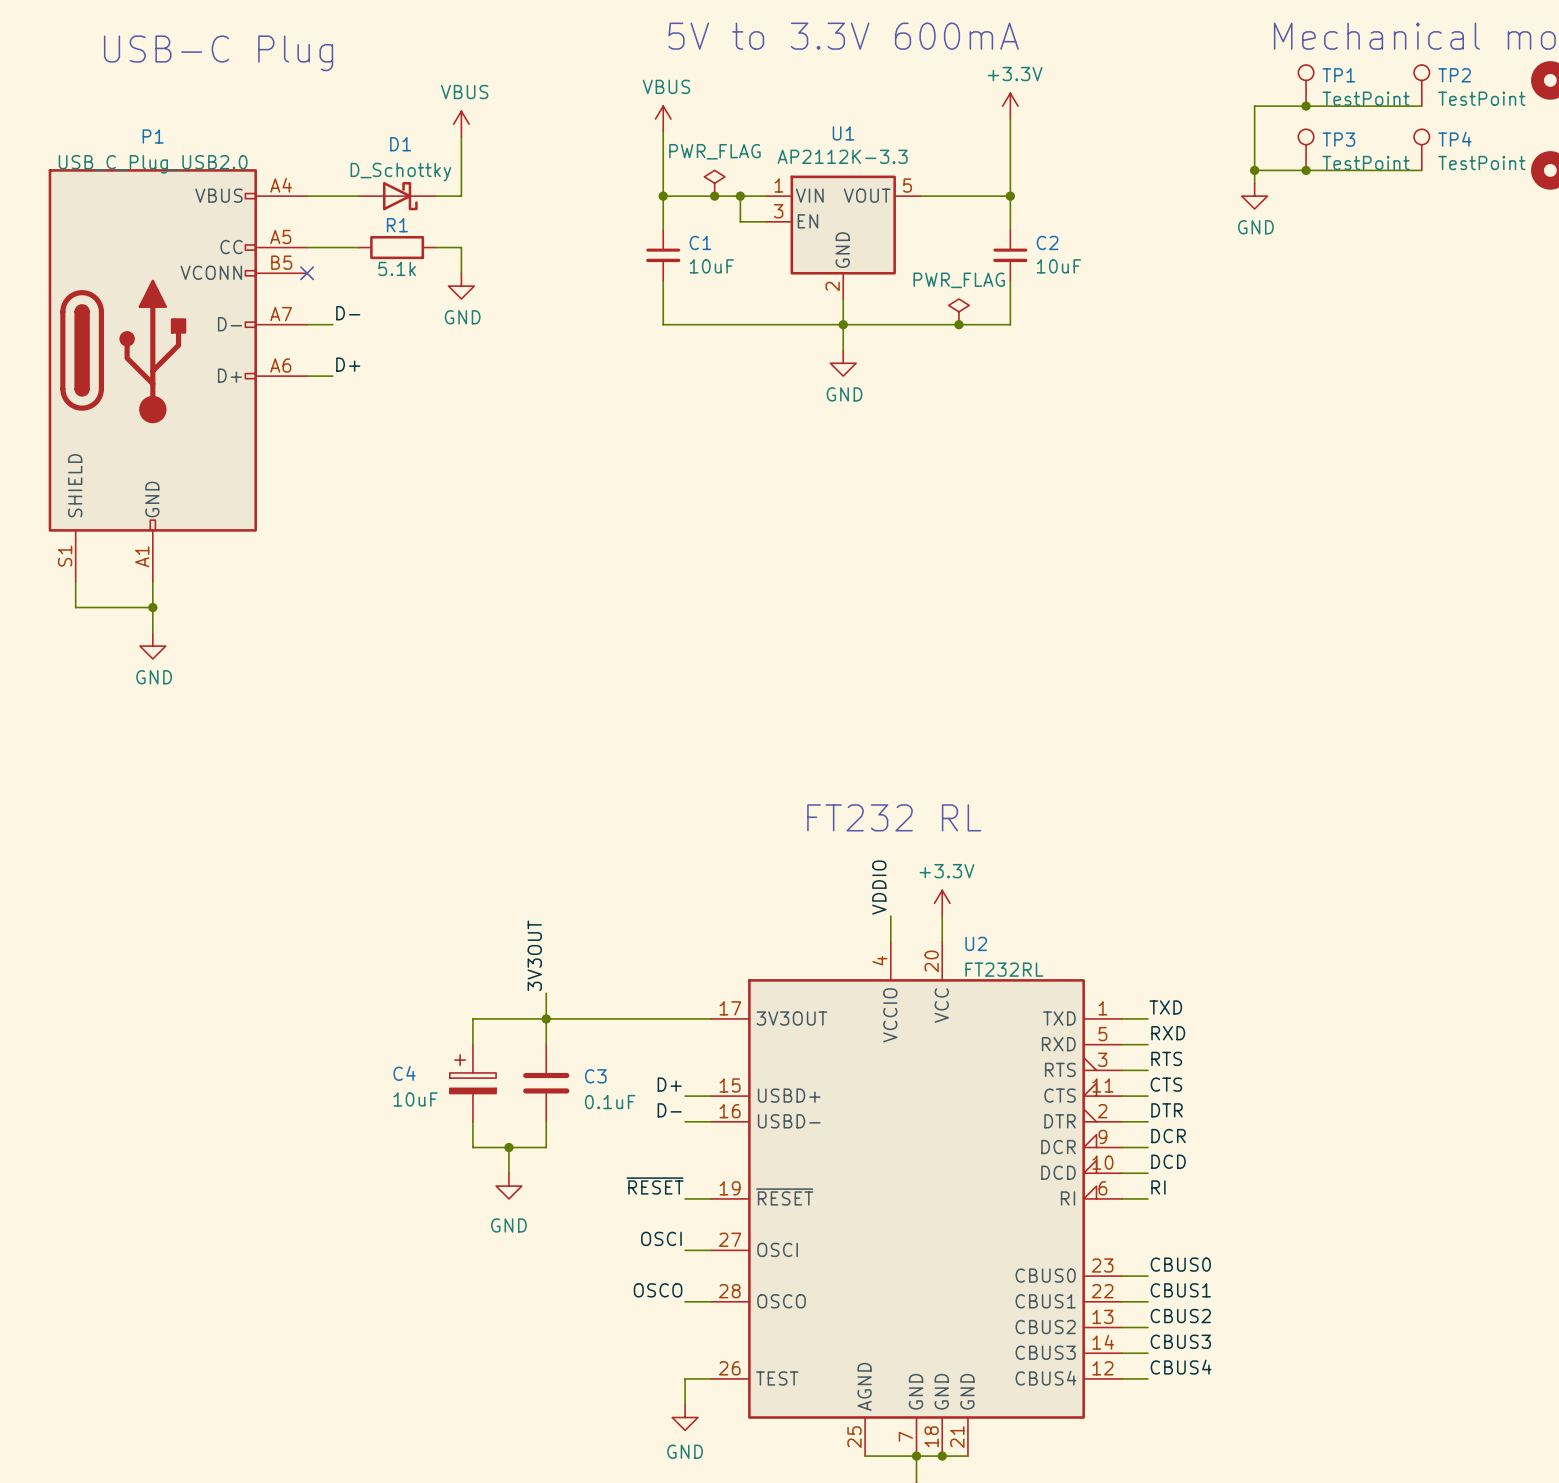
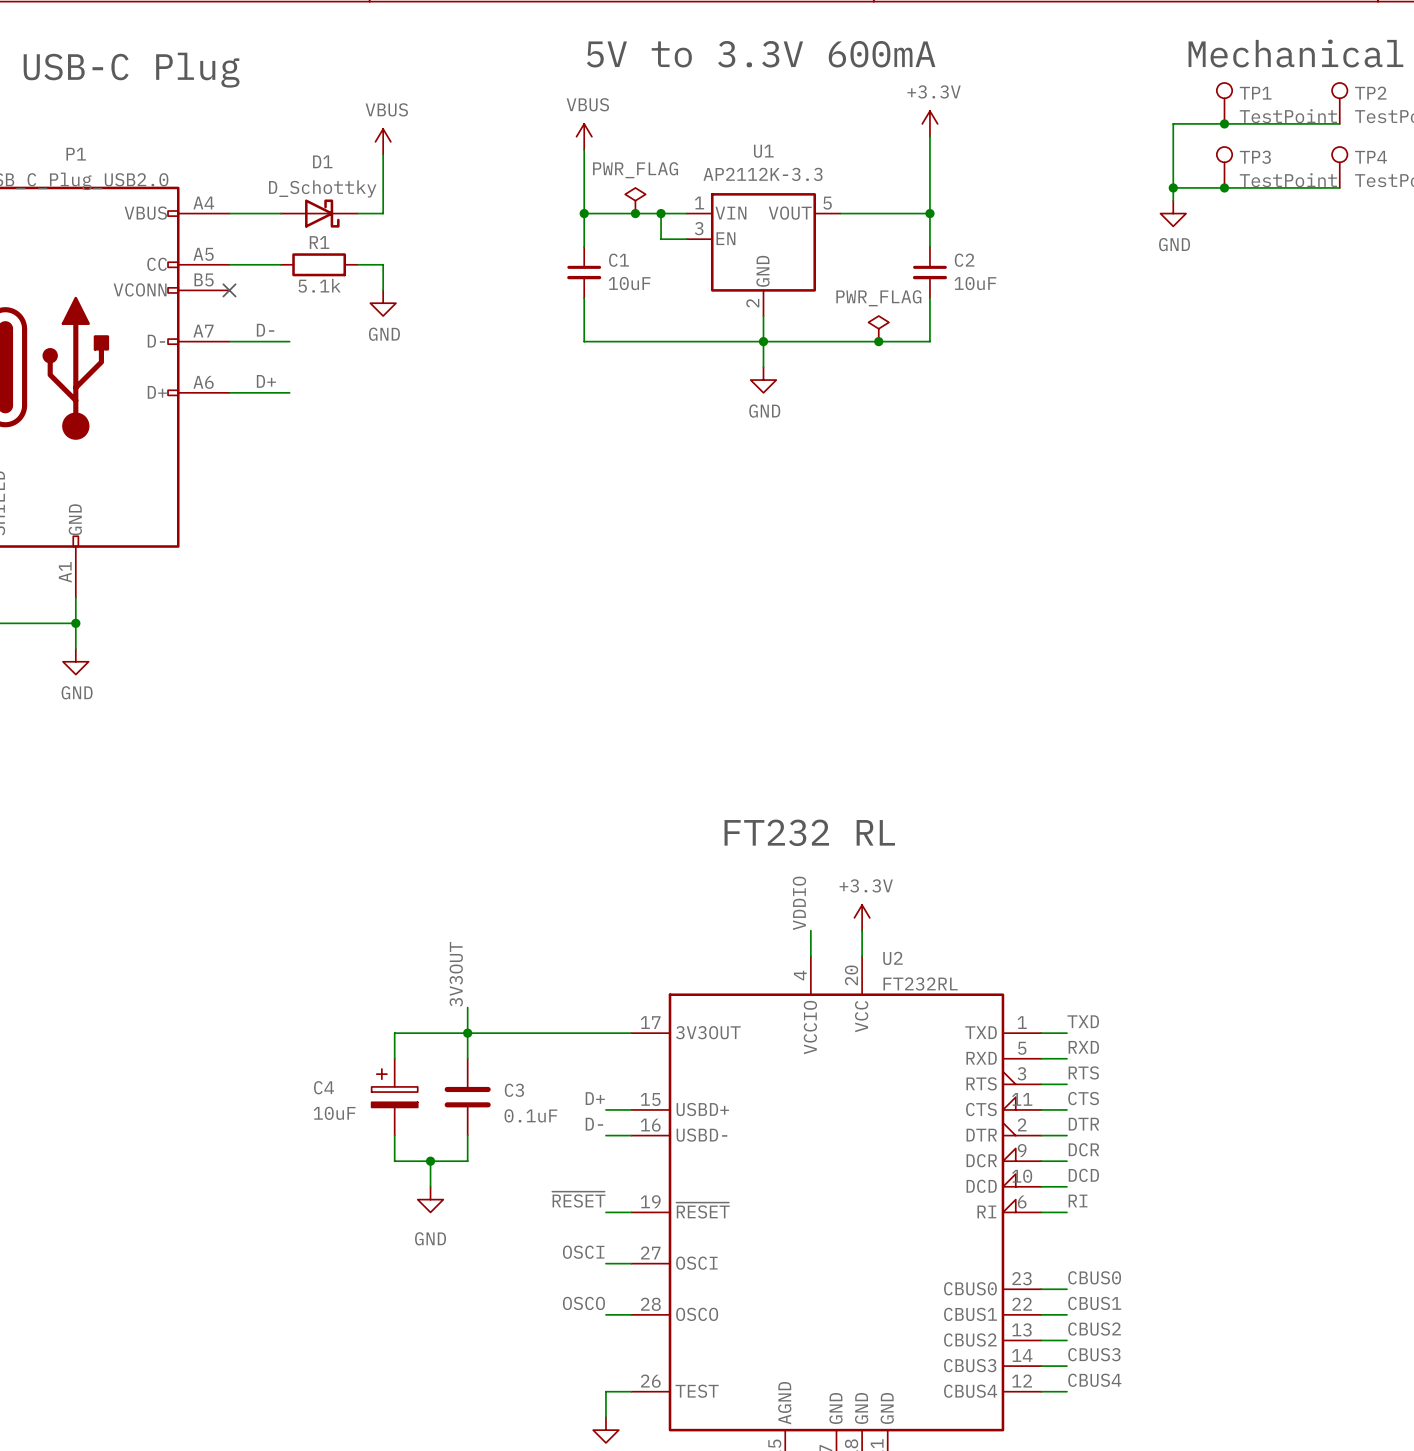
wire: none -> (255, 341) (289, 341)
wire: none -> (255, 392) (289, 392)

